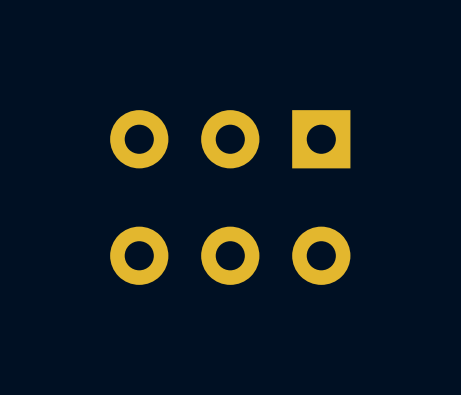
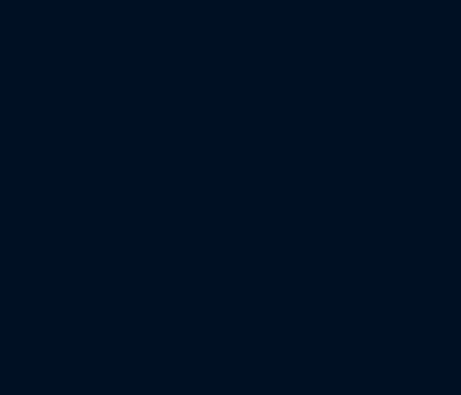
part: (230, 197) -> none

